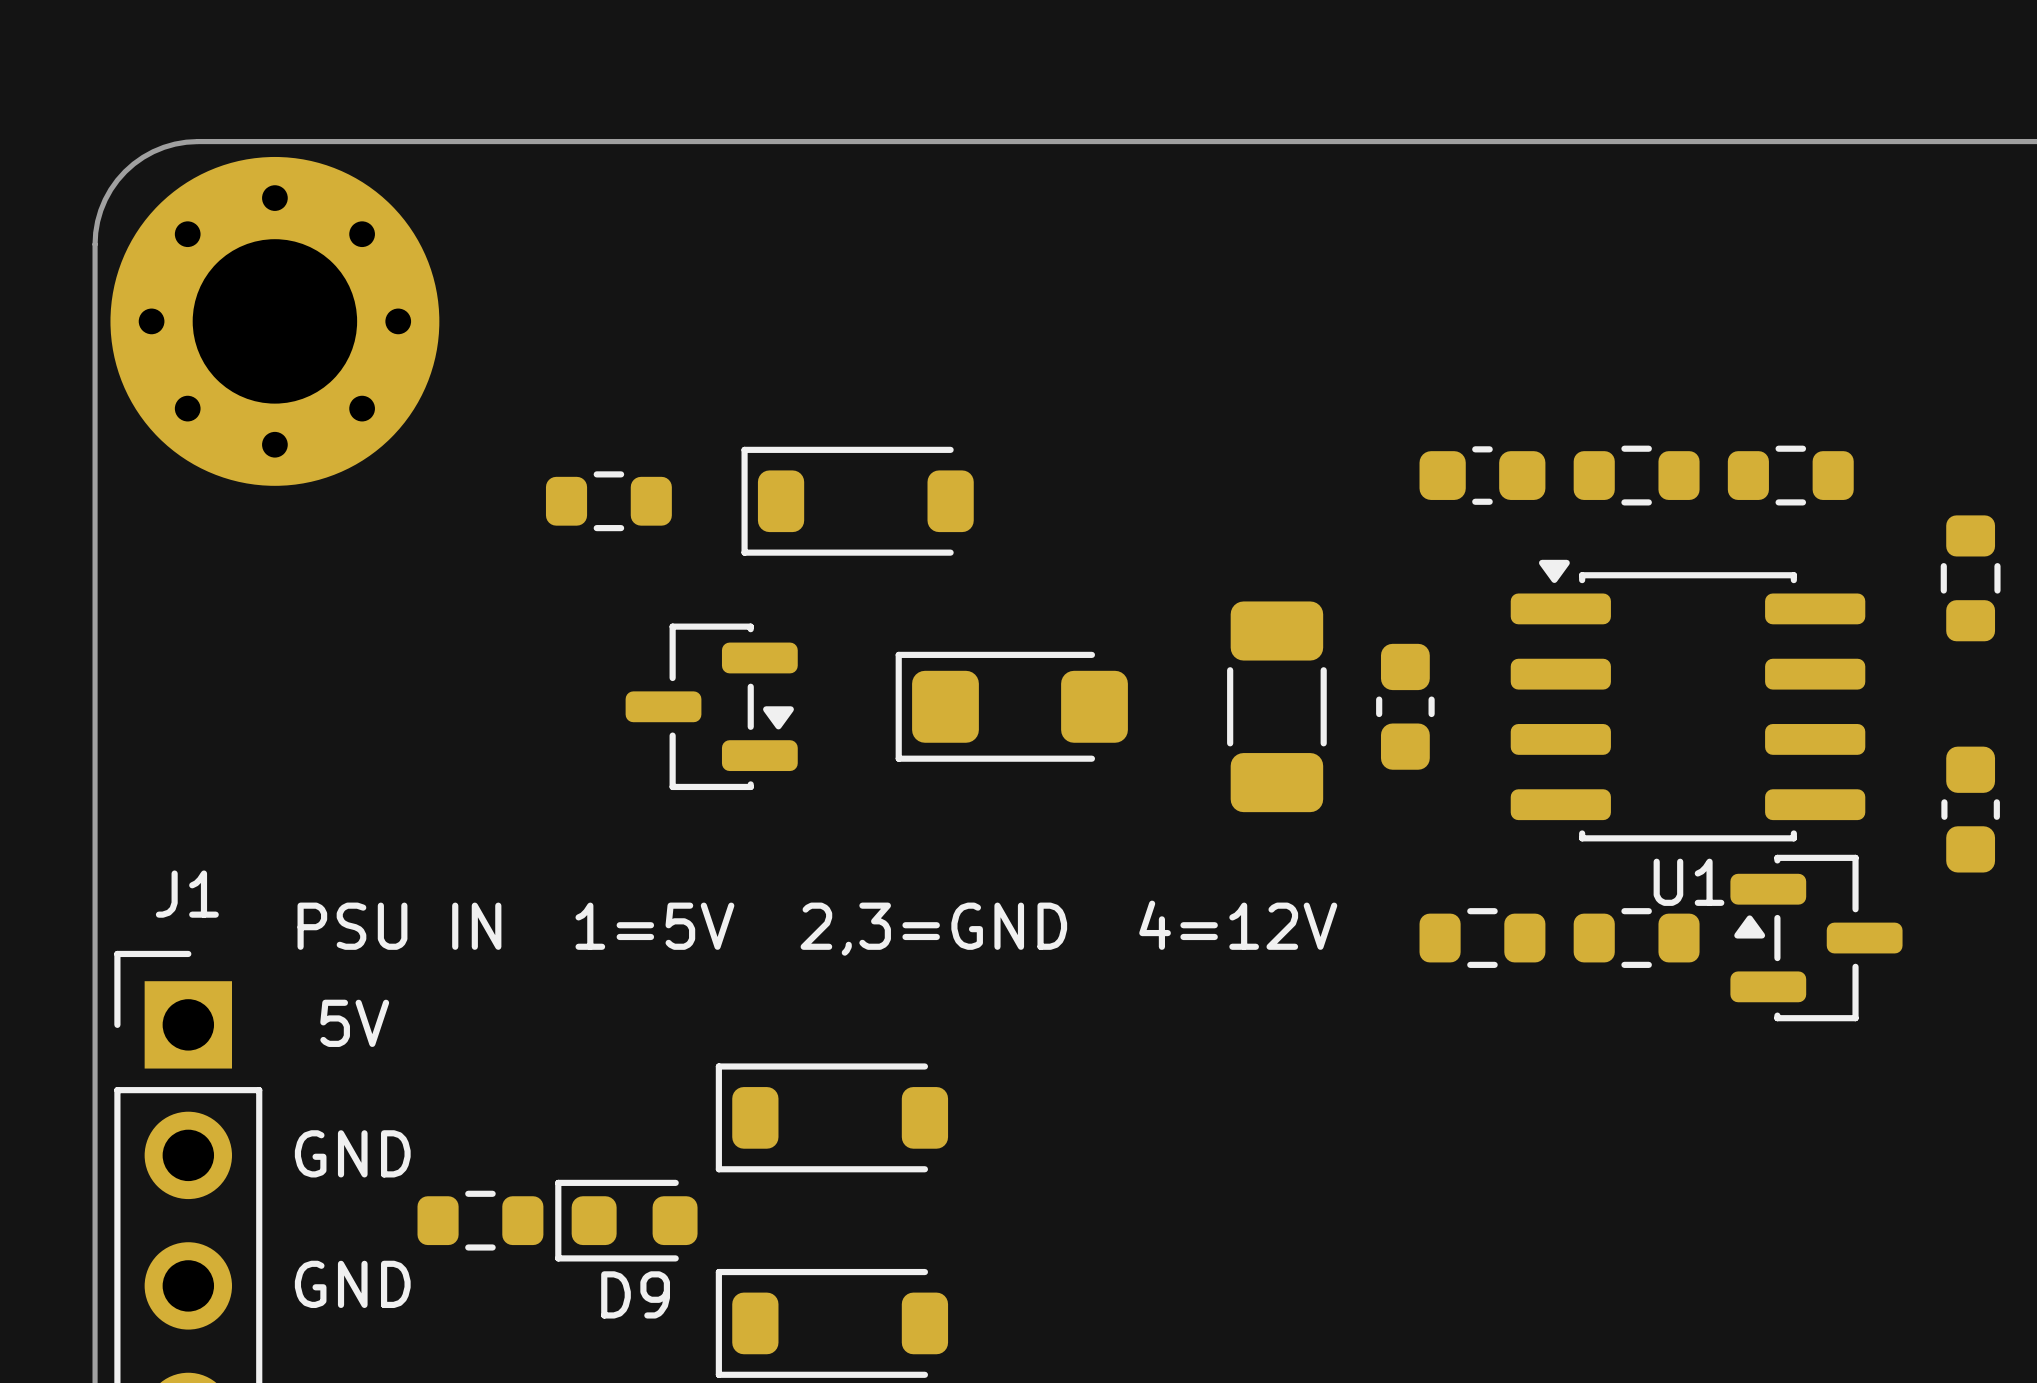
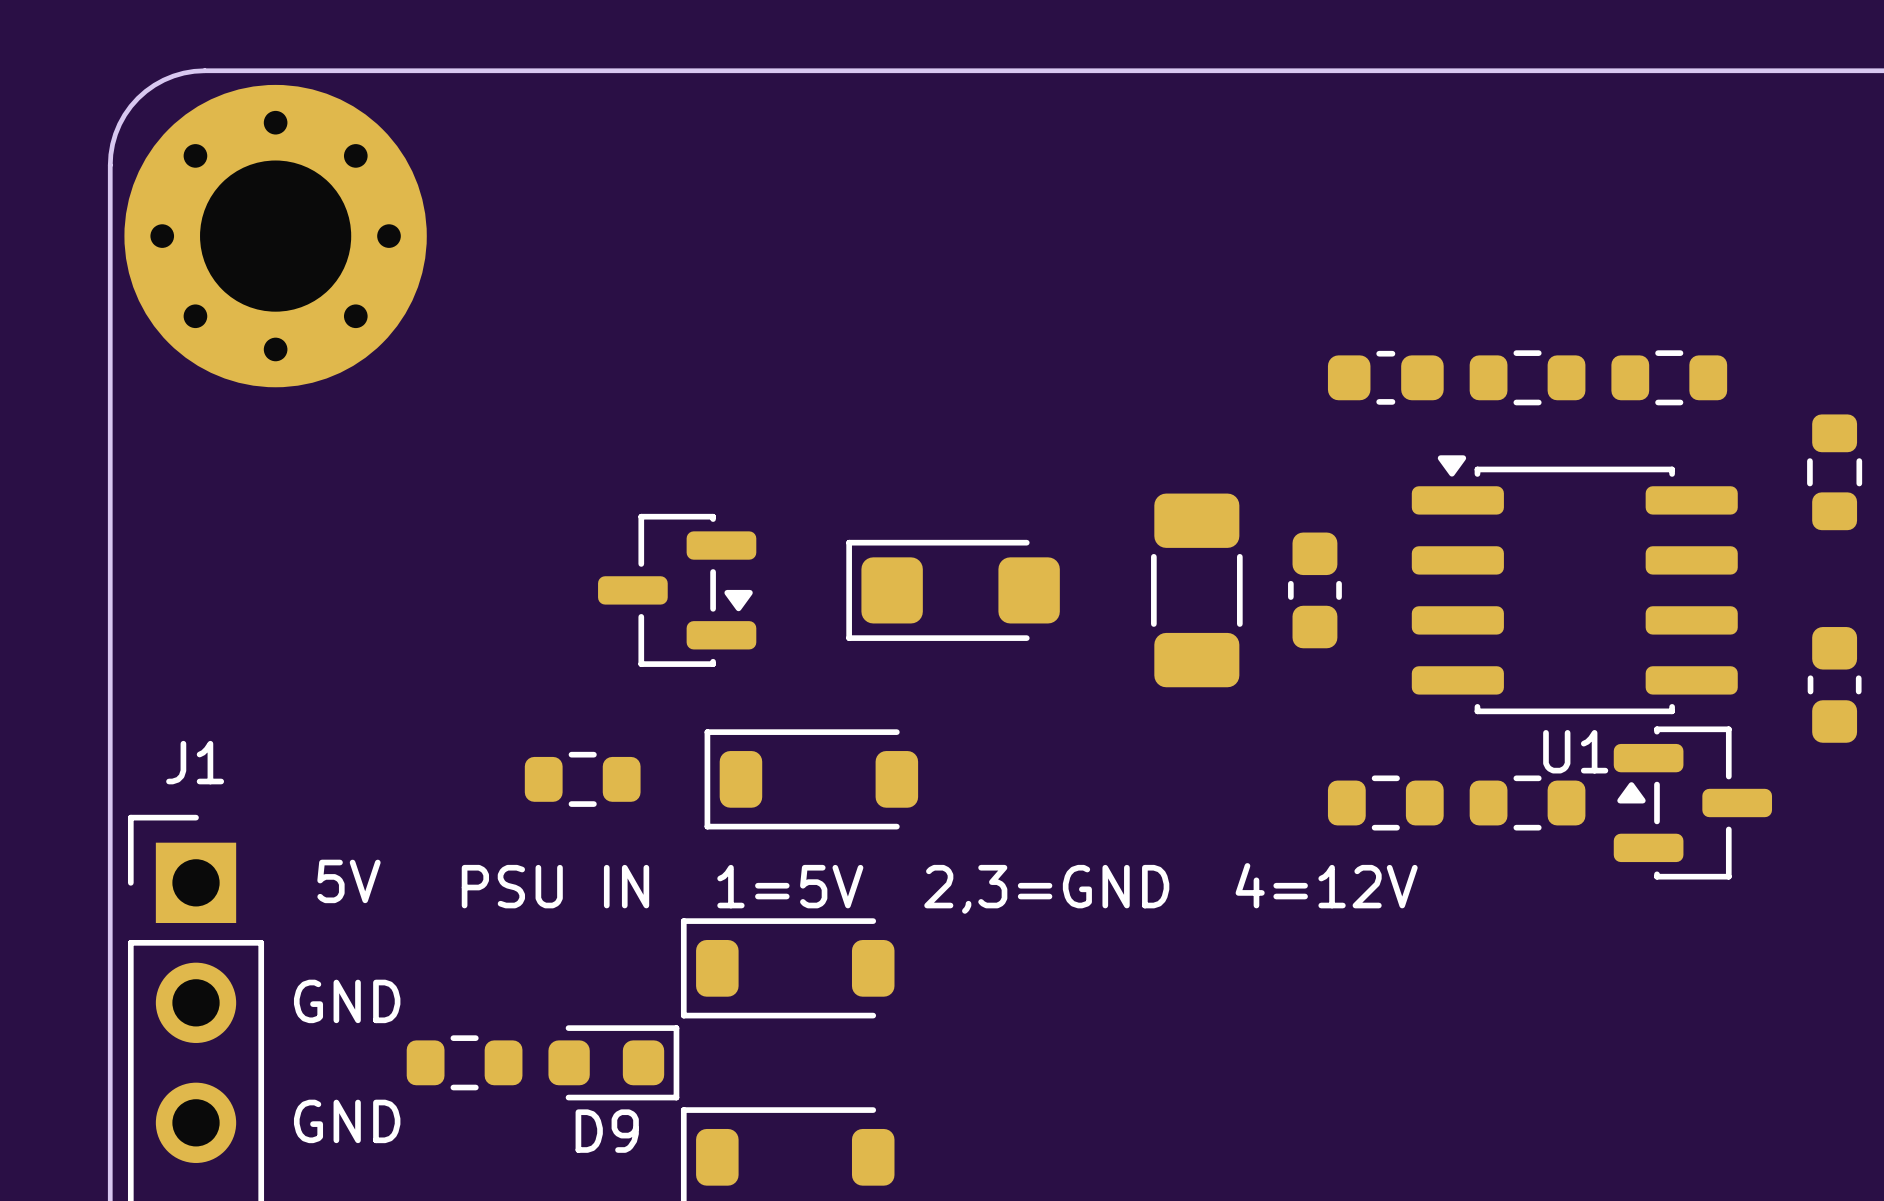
part position: (608, 501) -> (582, 779)
part position: (857, 501) -> (811, 779)
text position: PSU IN 1=5V 2,3=GND 4=12V (817, 928) -> PSU IN 1=5V 2,3=GND 4=12V (939, 888)
D9 rotation: 0° (626, 1220) -> 180° (613, 1062)

